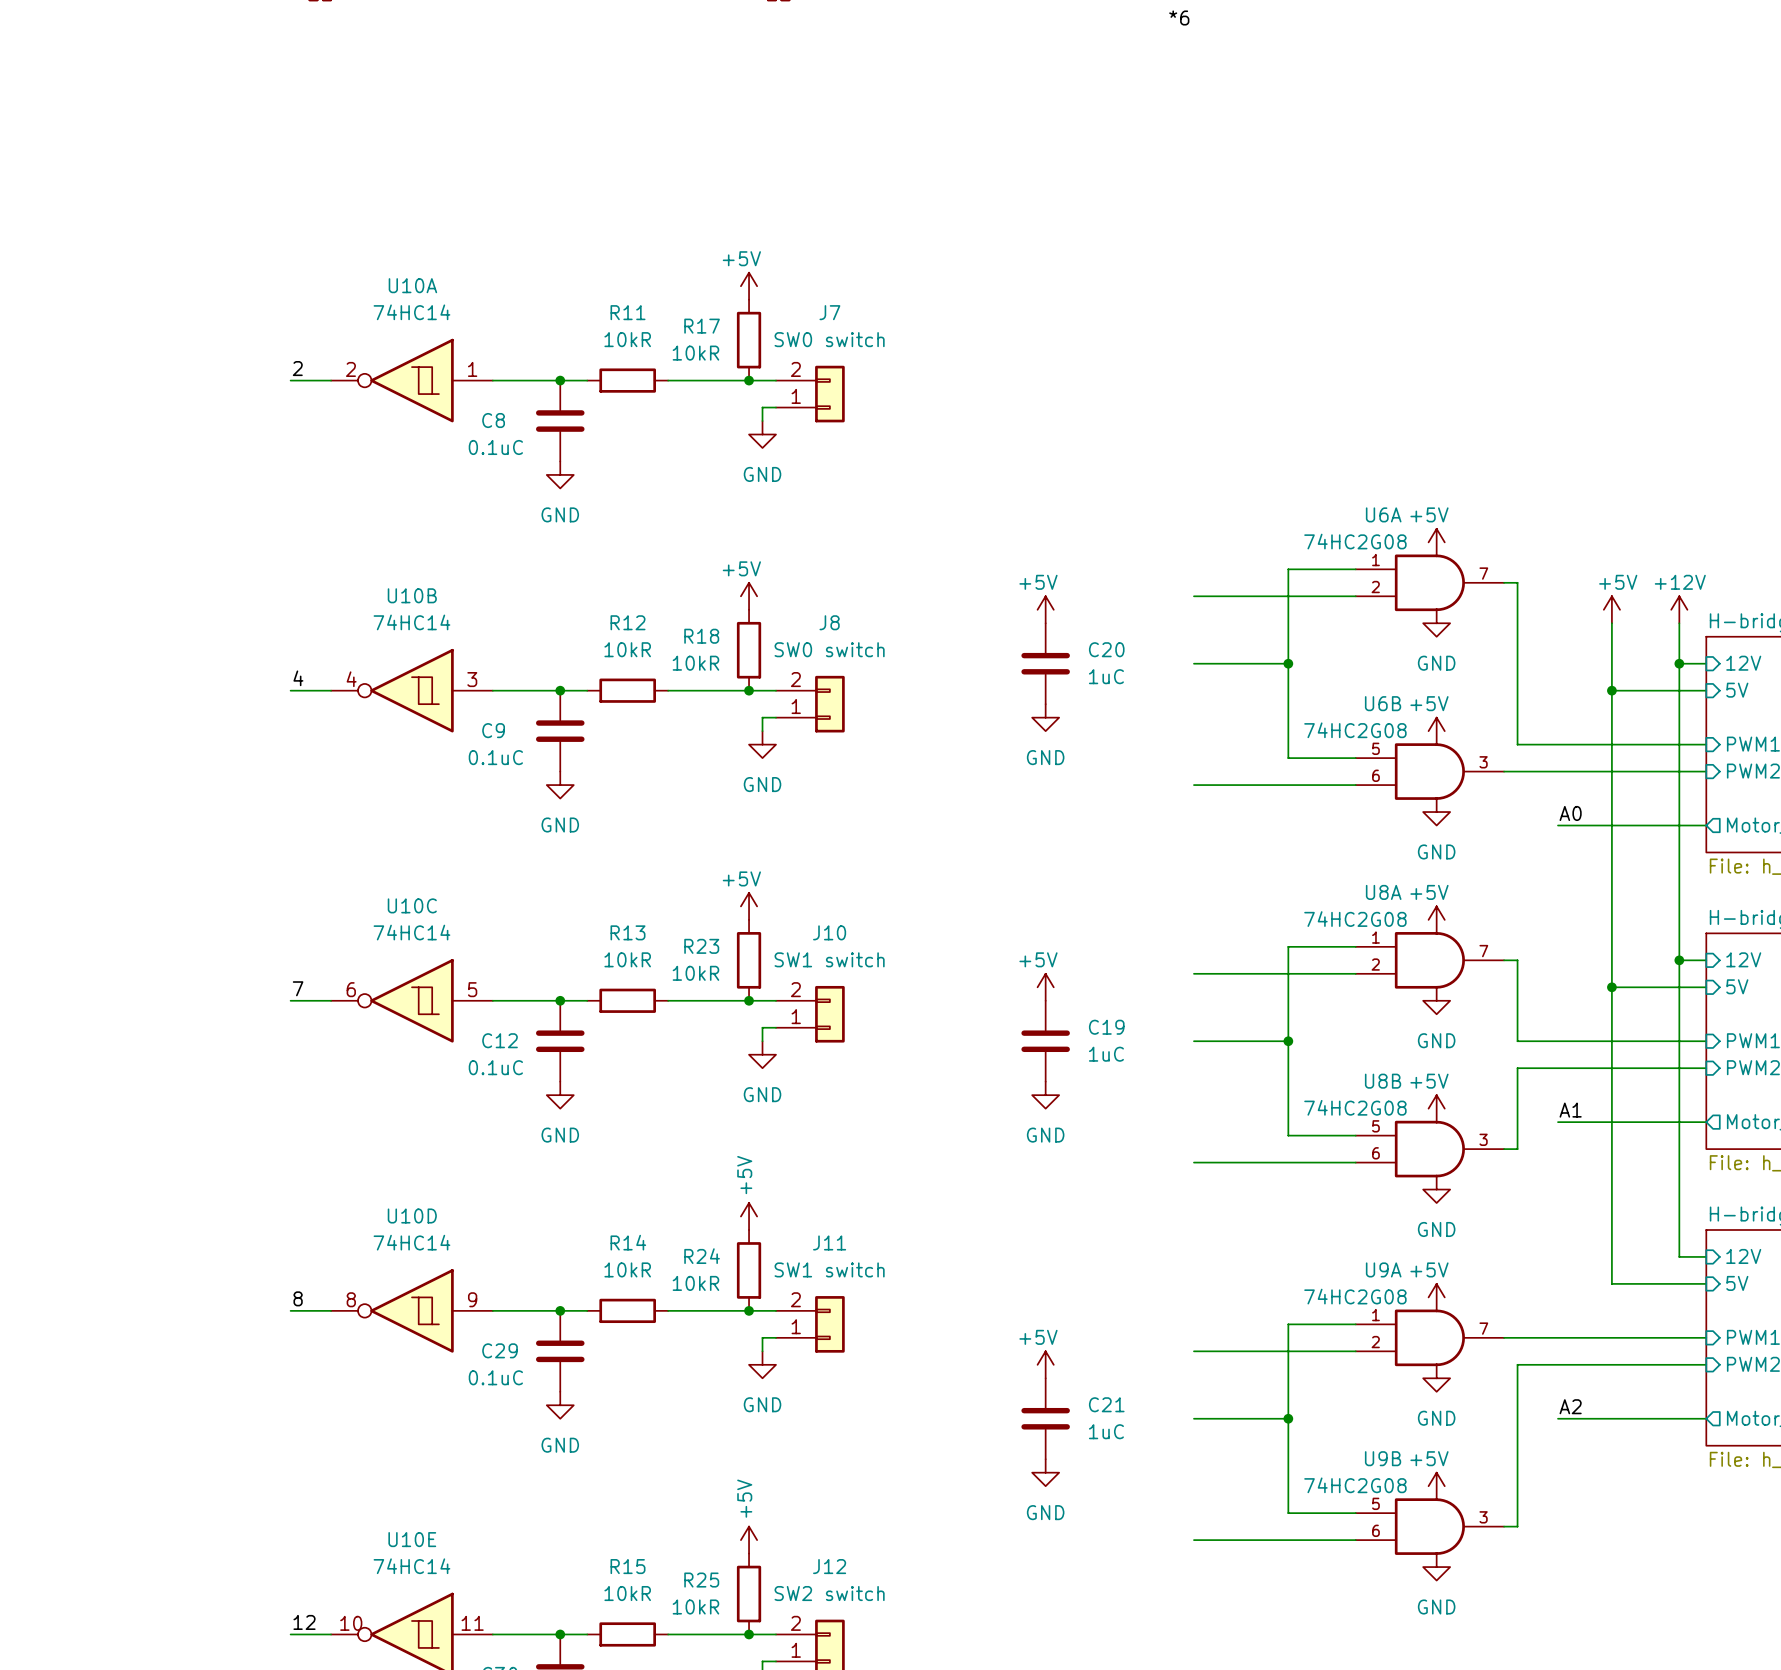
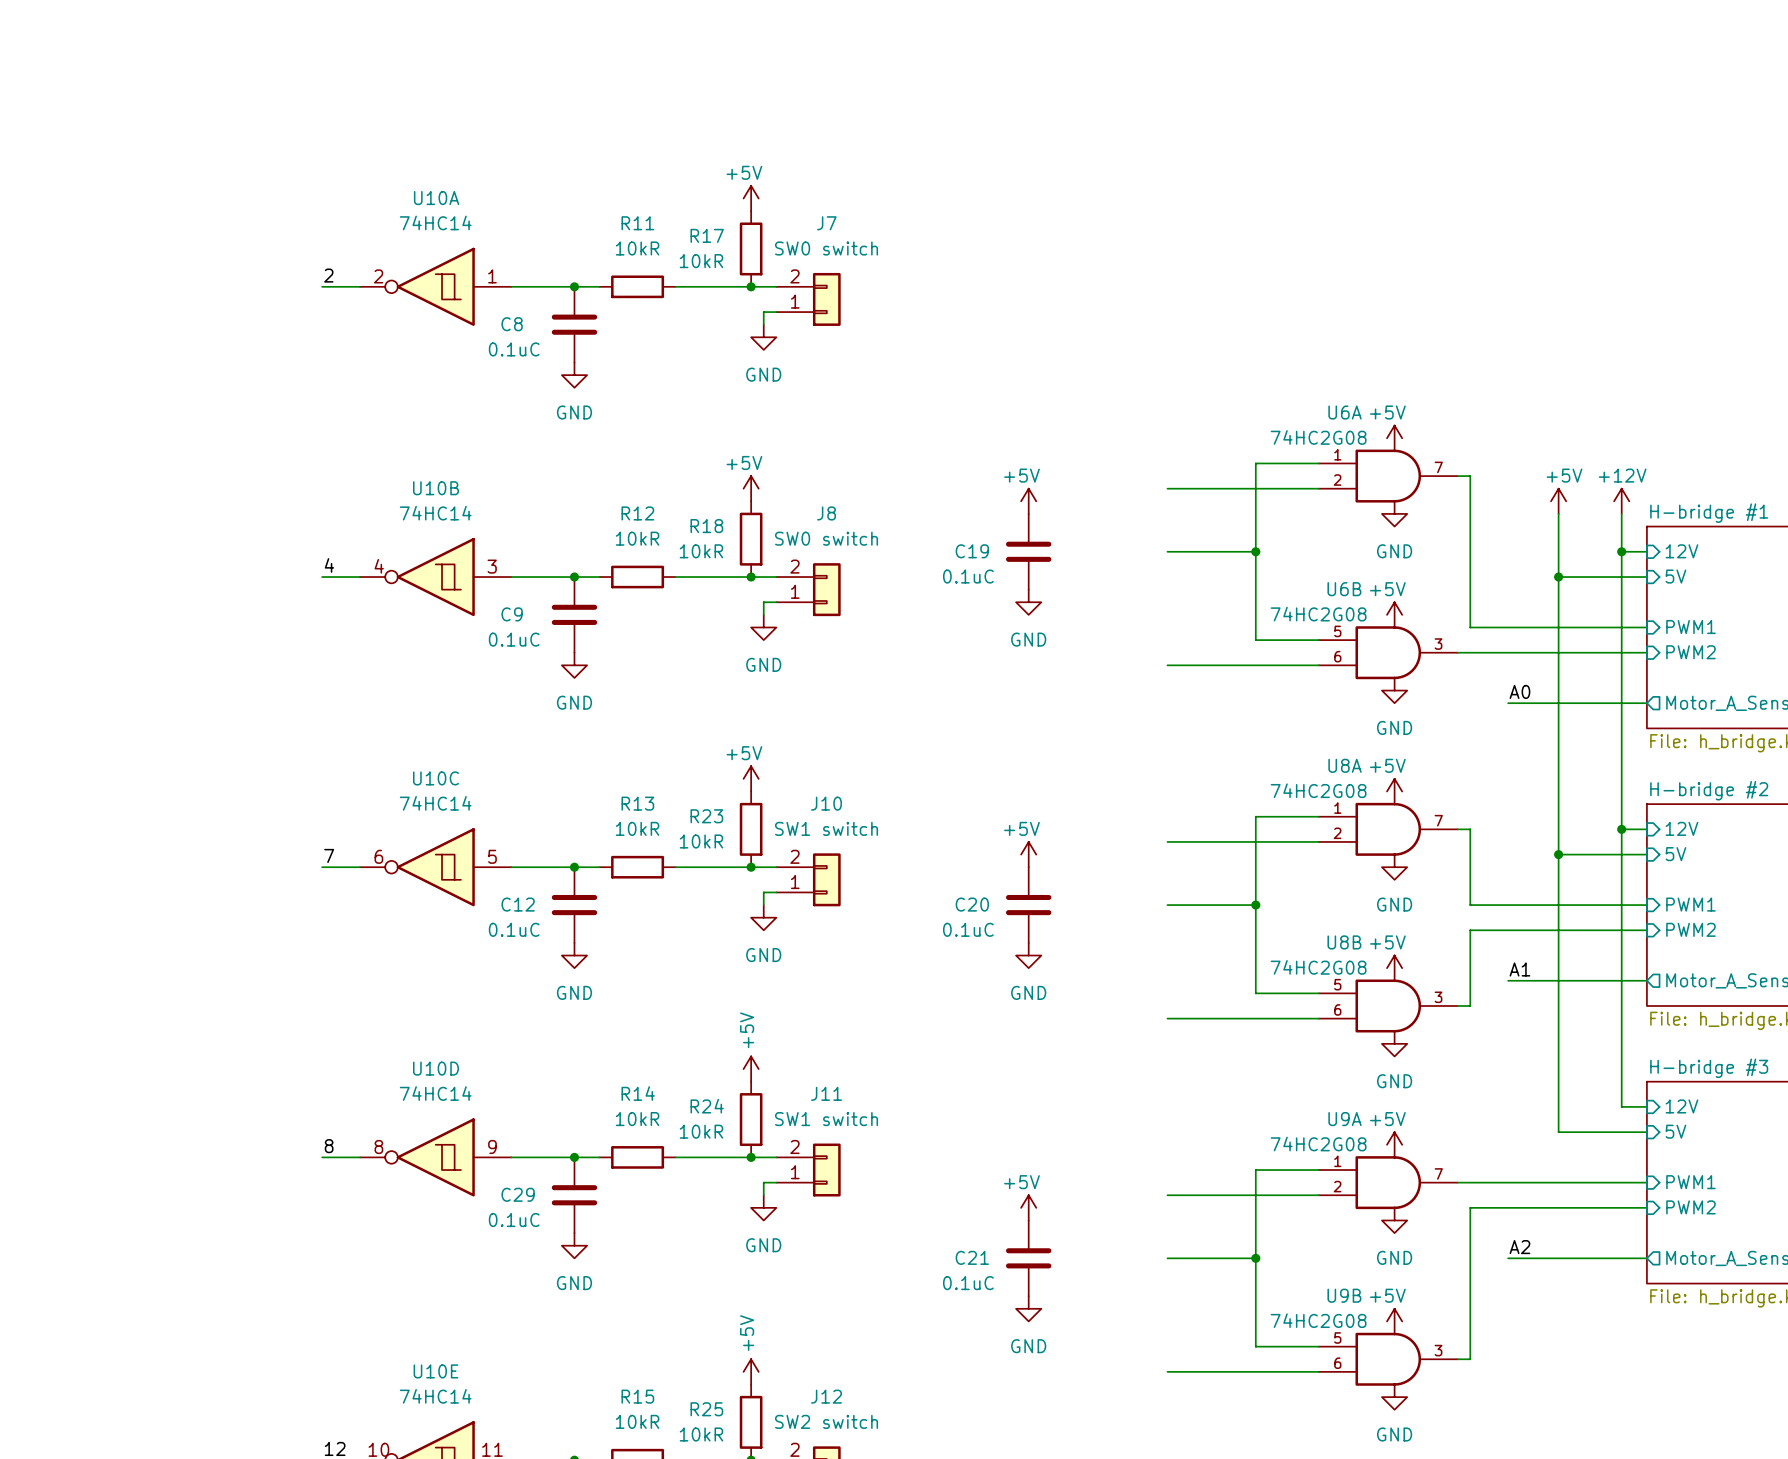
C20 name: C20 (1106, 649) -> C19 (972, 551)
C20 value: 1uC (1106, 676) -> 0.1uC (968, 576)
C19 name: C19 (1106, 1027) -> C20 (972, 904)
C19 value: 1uC (1106, 1054) -> 0.1uC (968, 929)
C21 name position: C21 (1106, 1404) -> C21 (972, 1257)
C21 value: 1uC (1106, 1431) -> 0.1uC (968, 1283)

